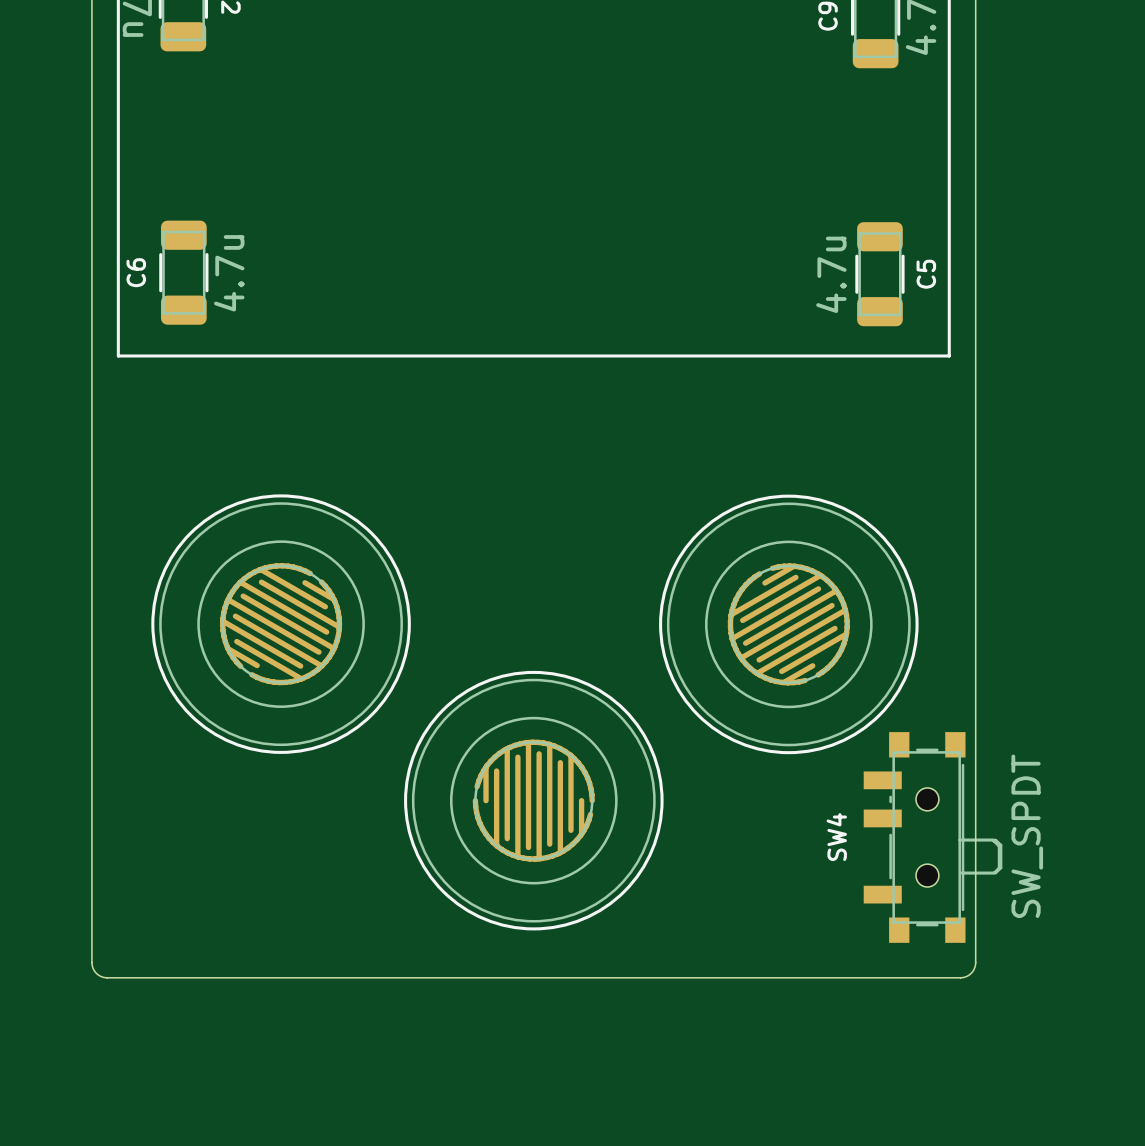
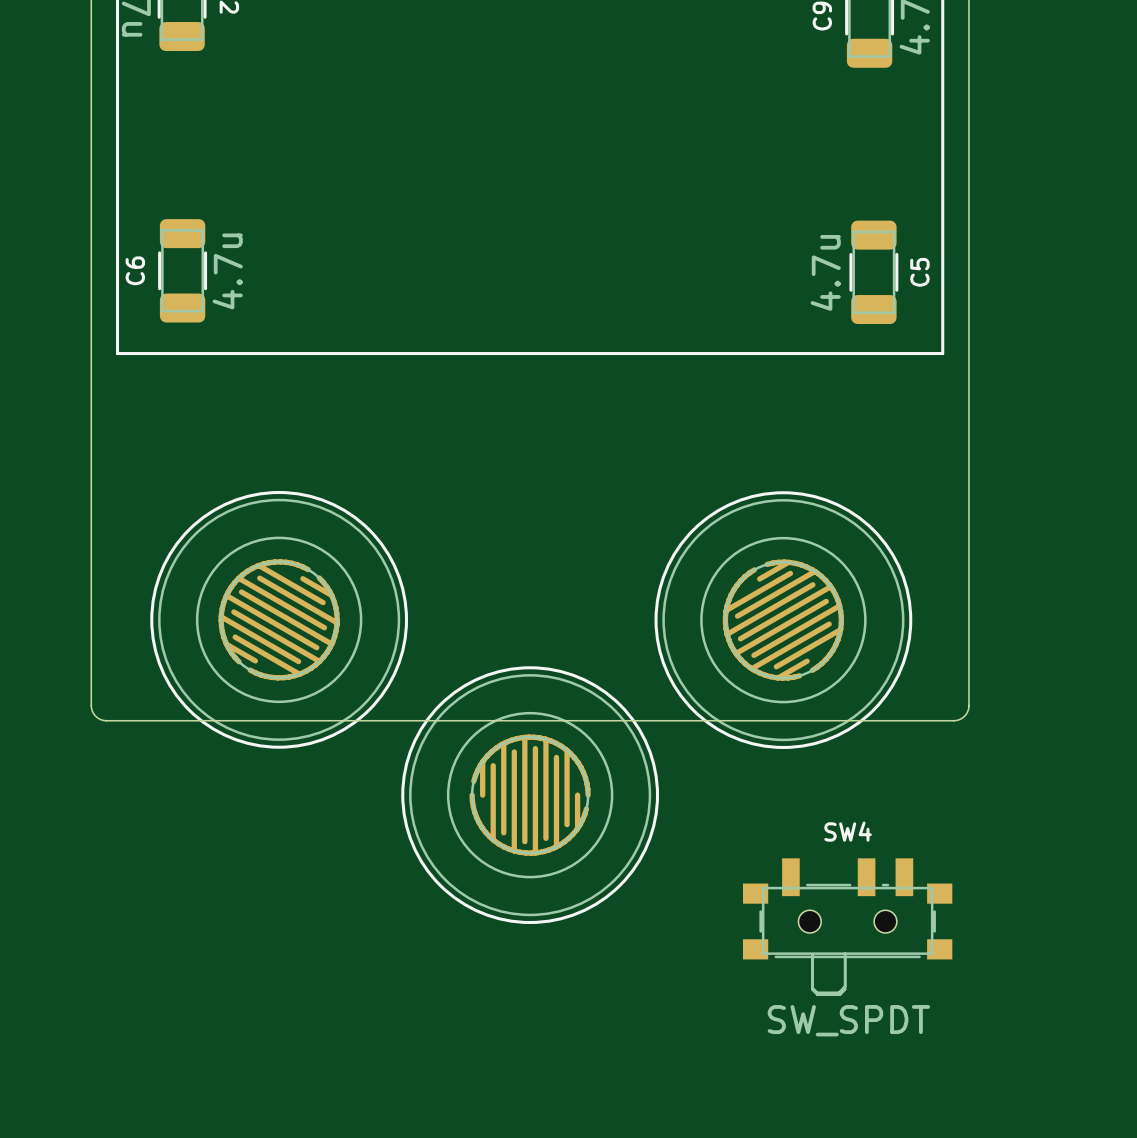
board edge: (91, 710) (91, 962) -> none
board edge: (975, 710) (975, 962) (972, 971) (964, 977) (107, 977) (96, 973) (91, 962) -> (968, 705) (964, 716) (953, 720) (106, 720) (95, 716) (91, 705)
SW4 rotation: 0° (933, 837) -> 90° clockwise (847, 927)

